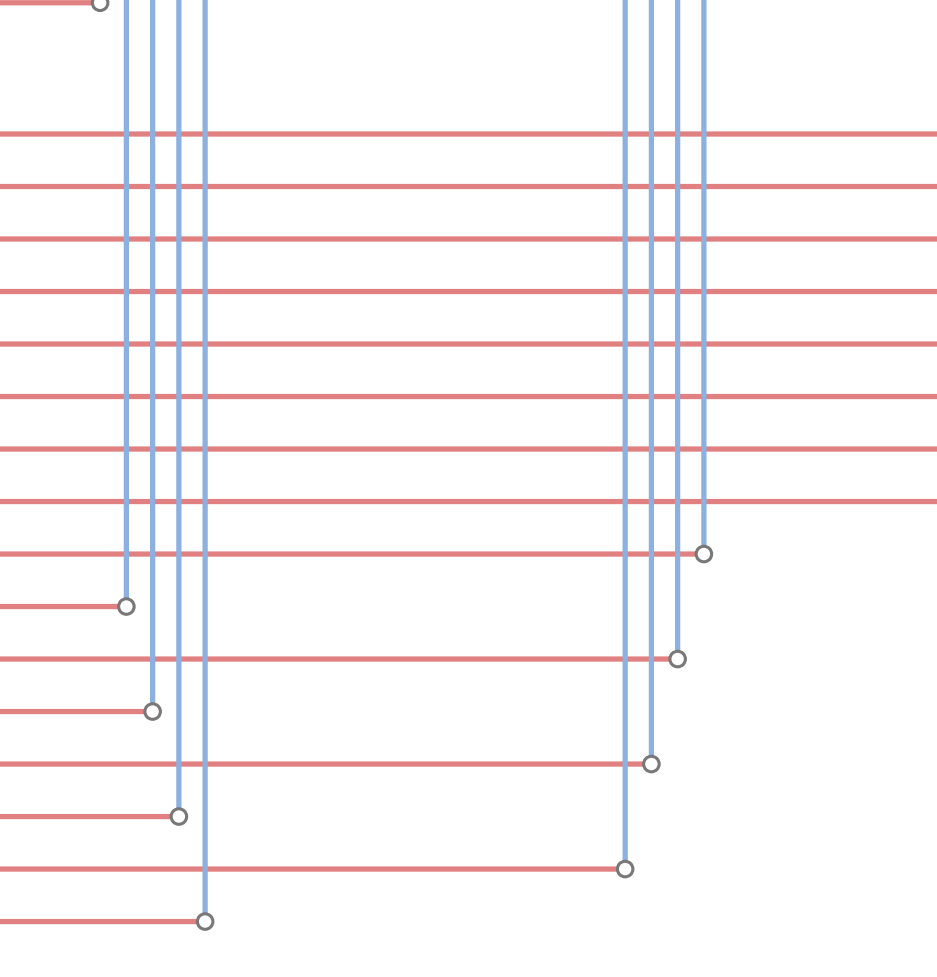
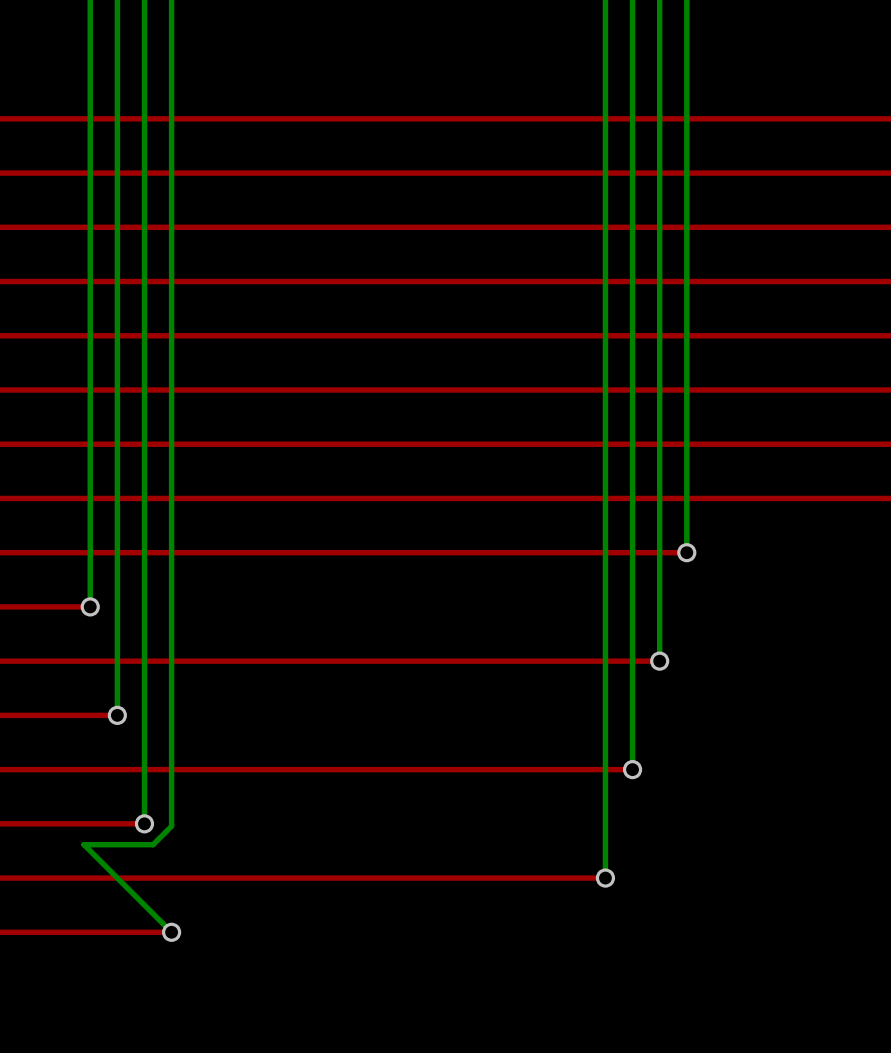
bottom track: (205, 818) (205, 921) -> (171, 826) (153, 844) (84, 844) (171, 932)

